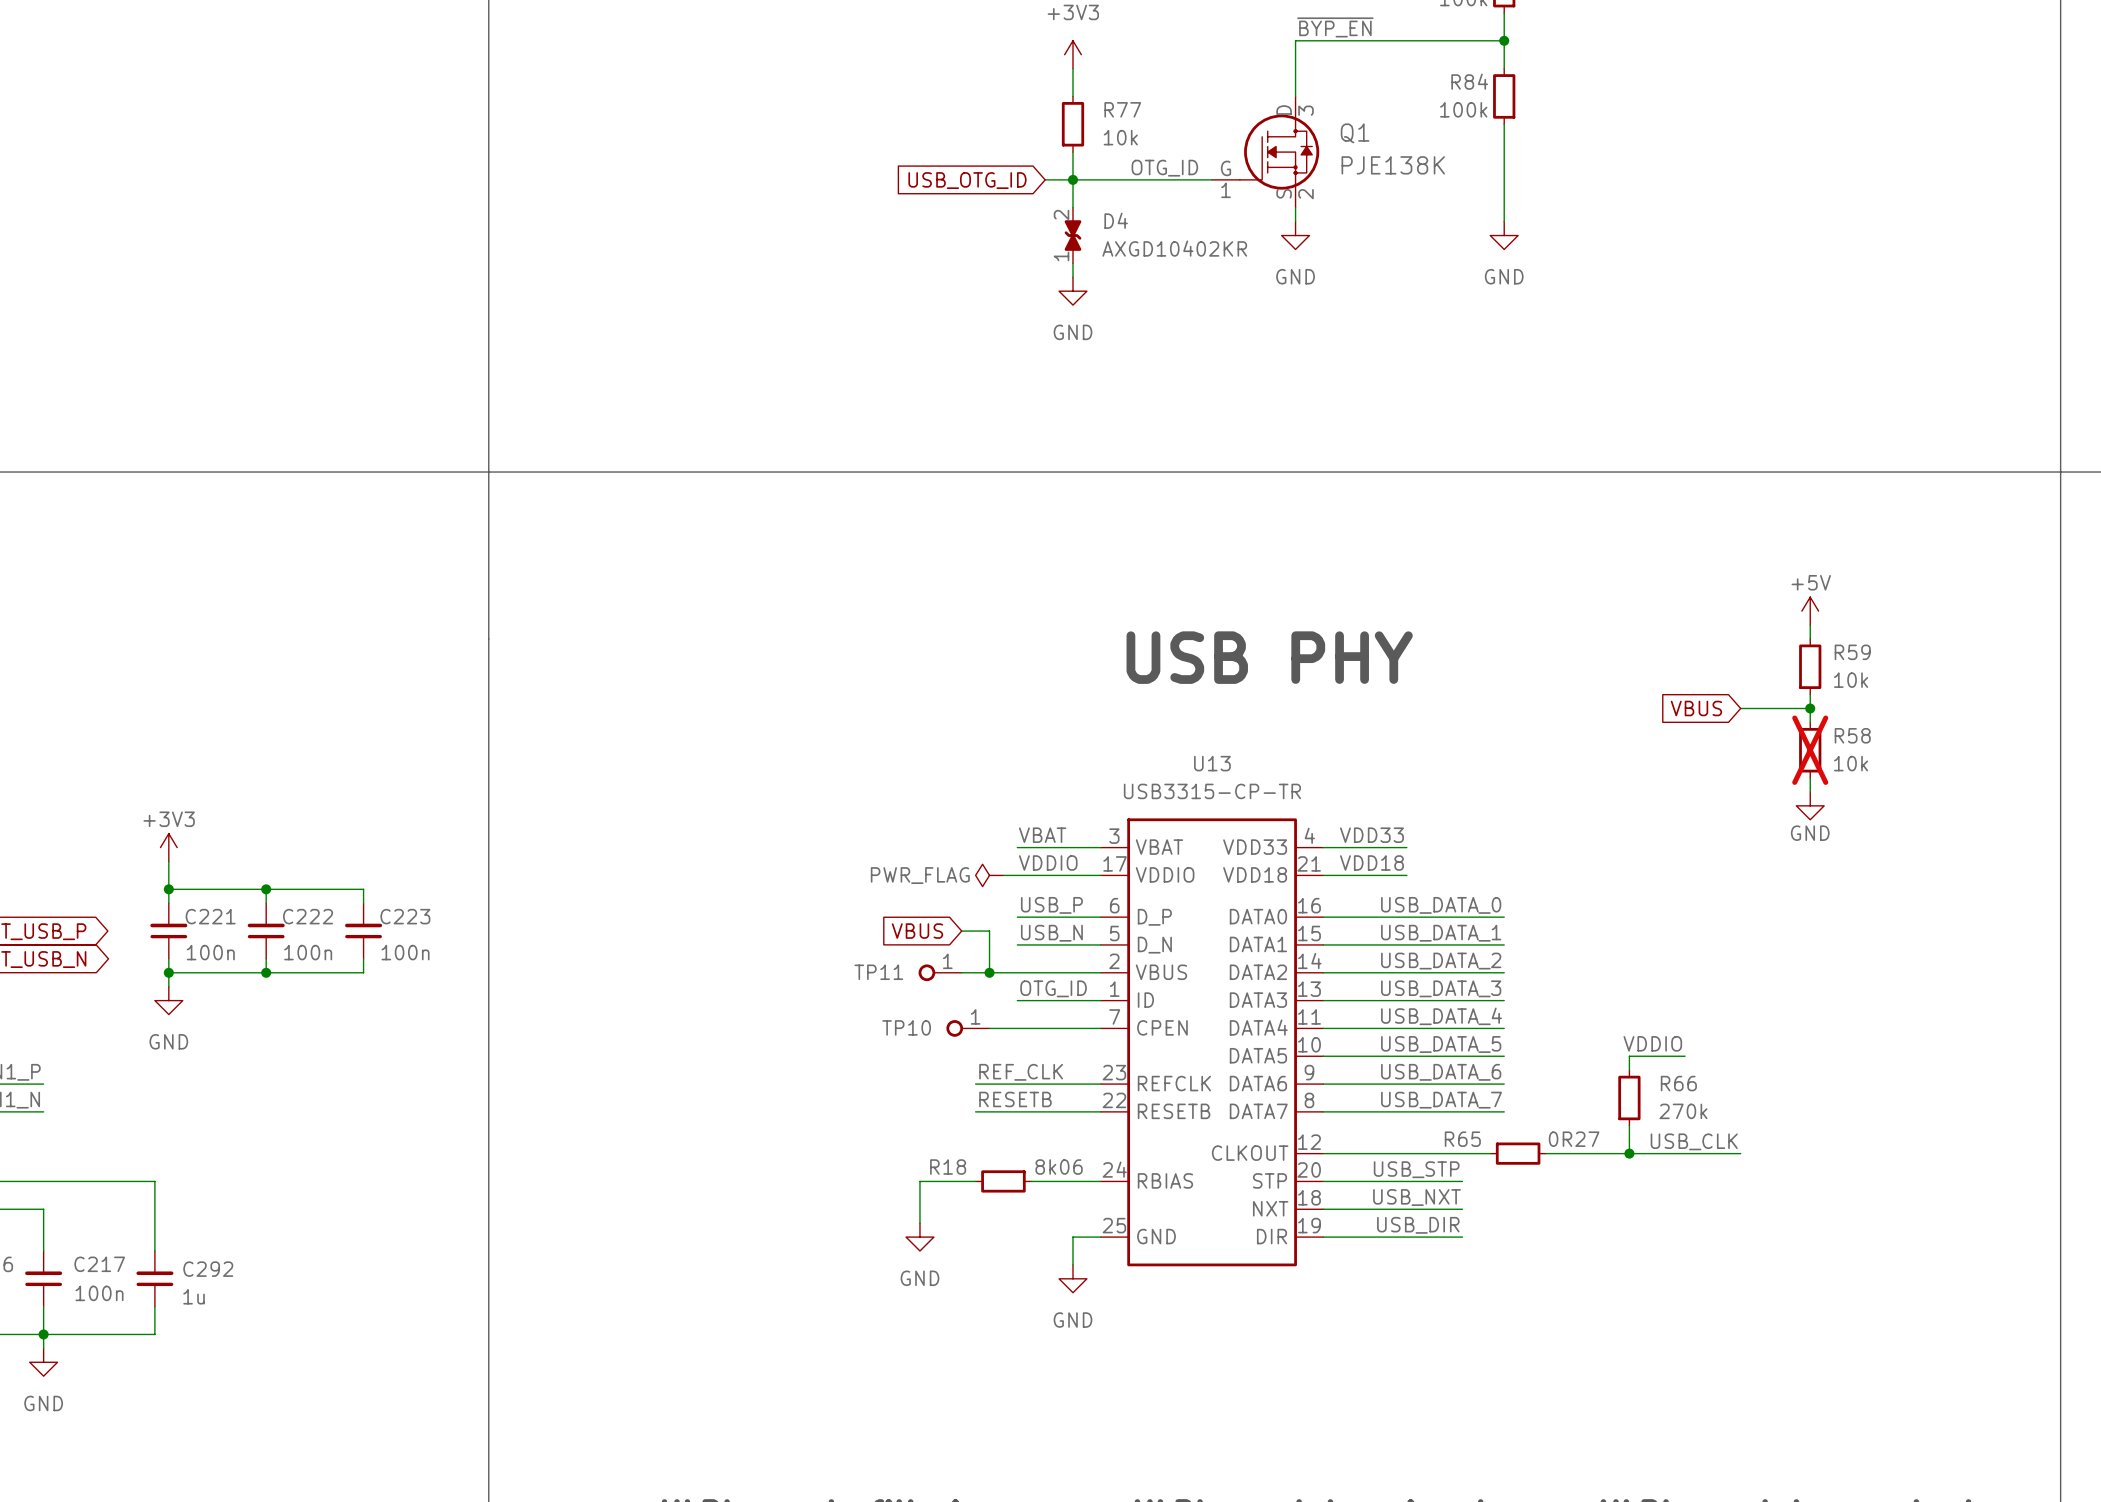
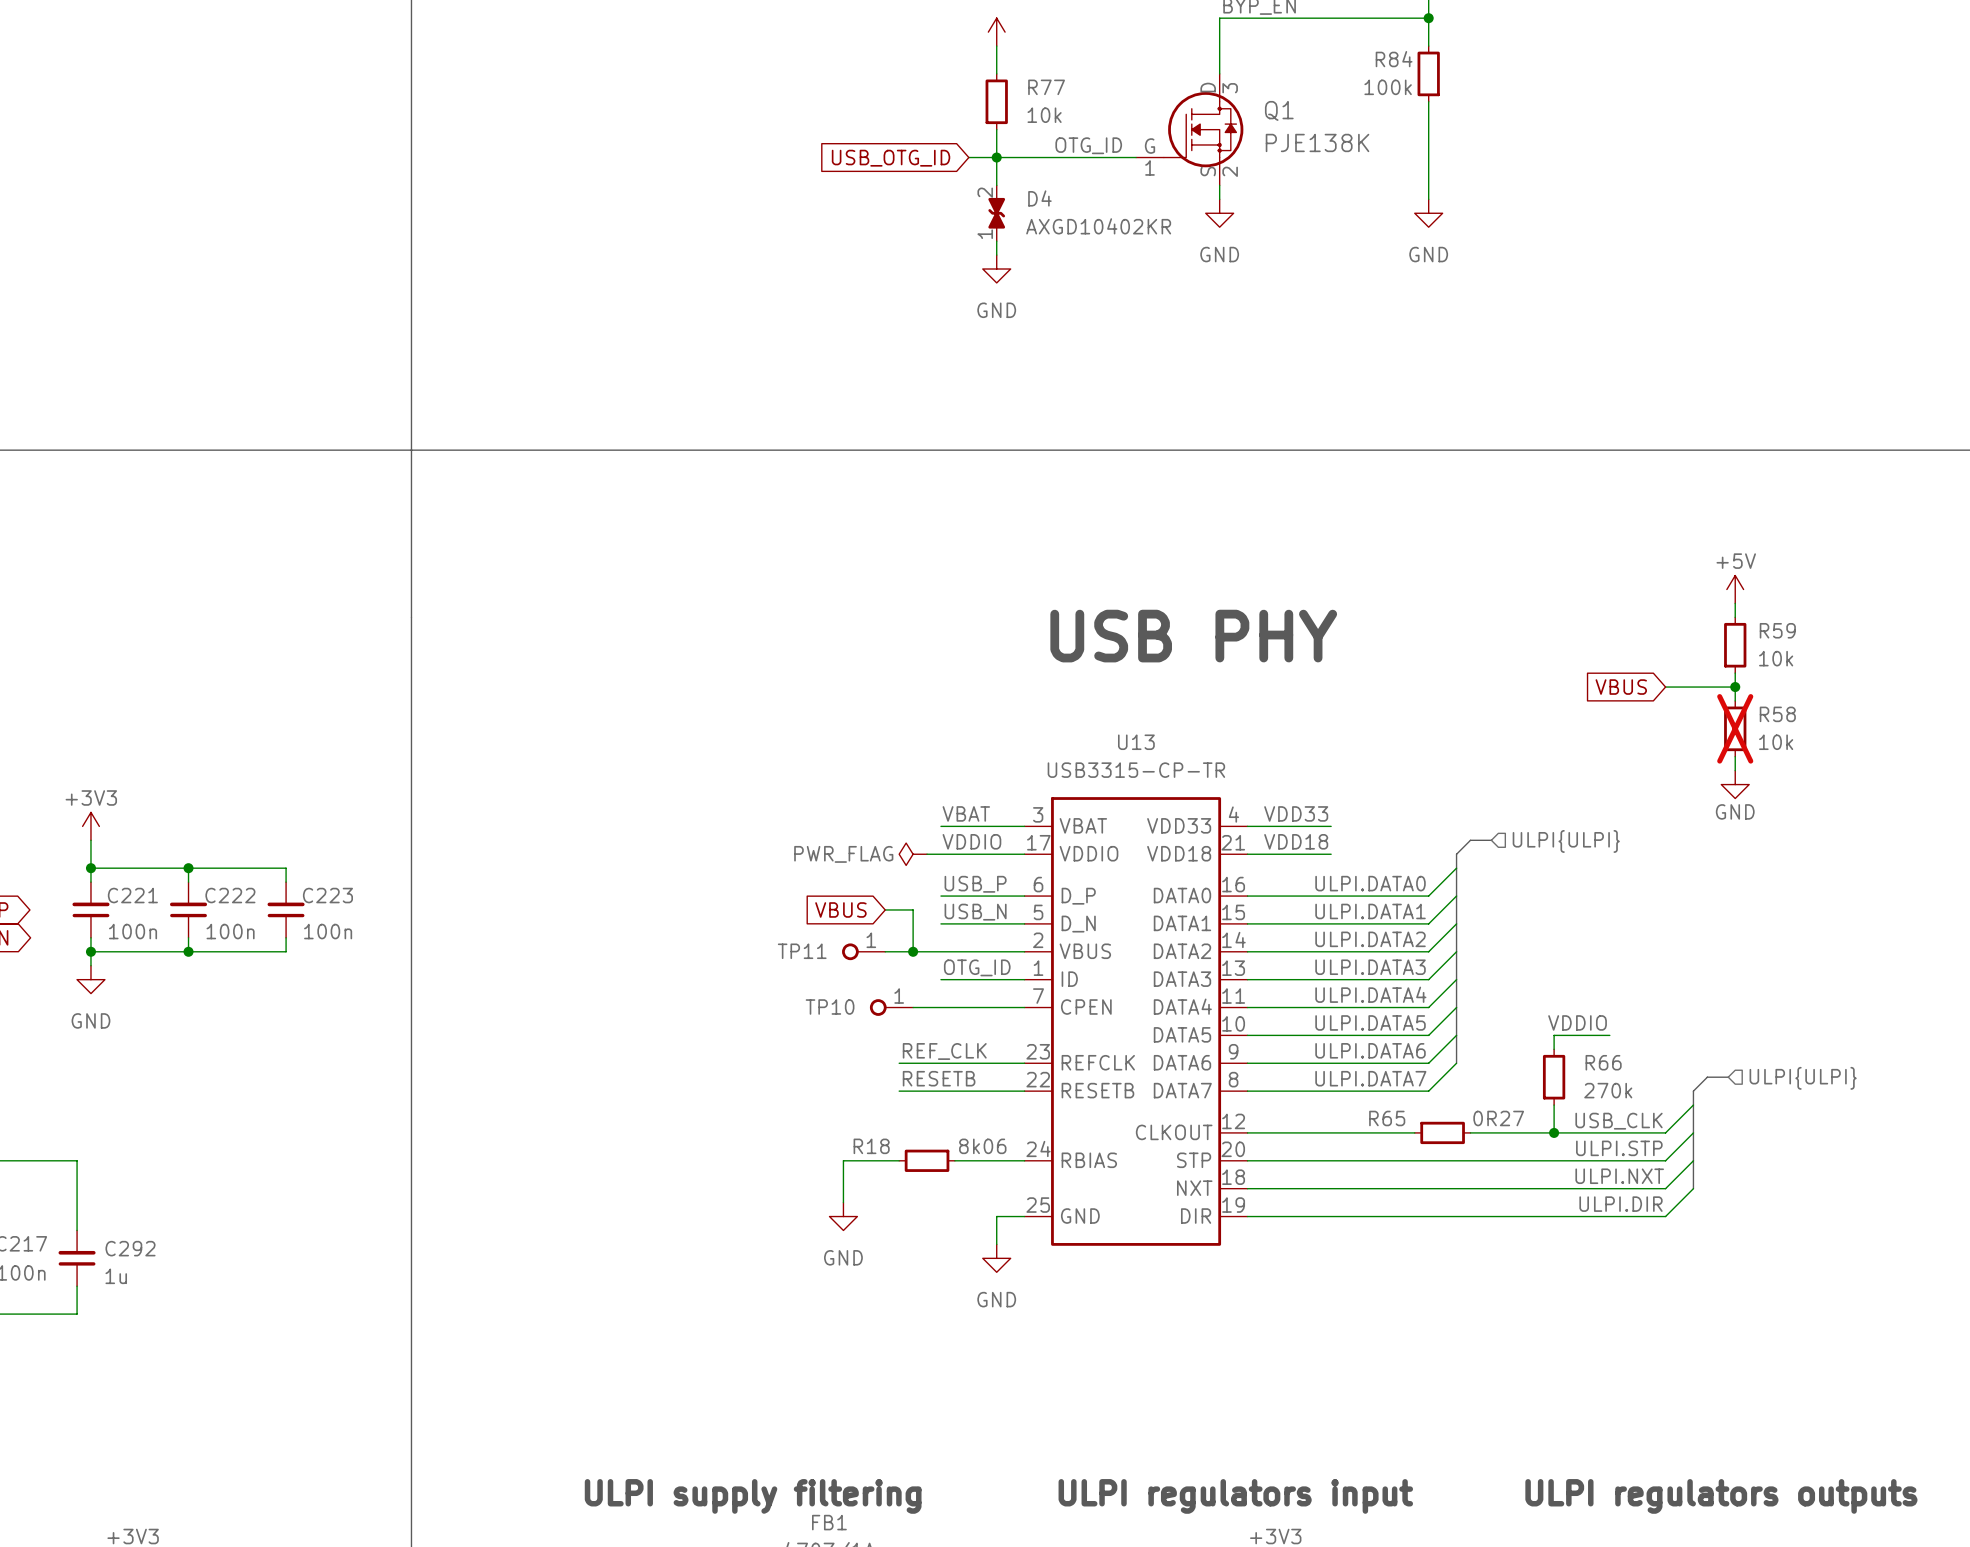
bus: none -> (1491, 840) (1470, 840) (1456, 854) (1456, 1063)
hierarchical label: none -> ULPI{ULPI} (1566, 841)
wire: none -> (1456, 868) (1428, 896)
label: USB_DATA_0 (1441, 905) -> ULPI.DATA0 (1370, 883)
wire: none -> (1456, 896) (1428, 923)
label: USB_DATA_1 (1441, 933) -> ULPI.DATA1 (1370, 911)
wire: none -> (1456, 923) (1428, 951)
label: USB_DATA_2 (1441, 961) -> ULPI.DATA2 (1370, 939)
wire: none -> (1456, 951) (1428, 979)
label: USB_DATA_3 (1441, 988) -> ULPI.DATA3 (1370, 967)
wire: none -> (1456, 979) (1428, 1007)
label: USB_DATA_4 (1441, 1016) -> ULPI.DATA4 (1370, 994)
wire: none -> (1456, 1007) (1428, 1035)
label: USB_DATA_5 (1441, 1044) -> ULPI.DATA5 (1370, 1022)
wire: none -> (1456, 1035) (1428, 1063)
label: USB_DATA_6 (1441, 1072) -> ULPI.DATA6 (1370, 1050)
wire: none -> (1456, 1063) (1428, 1091)
bus: none -> (1728, 1077) (1707, 1077) (1693, 1091) (1693, 1188)
hierarchical label: none -> ULPI{ULPI} (1803, 1078)
label: USB_DATA_7 (1441, 1100) -> ULPI.DATA7 (1370, 1078)
wire: none -> (1693, 1105) (1665, 1132)
wire: none -> (1693, 1132) (1665, 1160) (1386, 1160)
label: USB_STP (1416, 1169) -> none
label: none -> ULPI.STP (1619, 1148)
wire: none -> (1693, 1160) (1665, 1188) (1386, 1188)
label: none -> ULPI.NXT (1619, 1176)
label: USB_NXT (1417, 1197) -> none
wire: none -> (1693, 1188) (1665, 1216) (1386, 1216)
label: none -> ULPI.DIR (1621, 1204)
label: USB_DIR (1418, 1225) -> none

